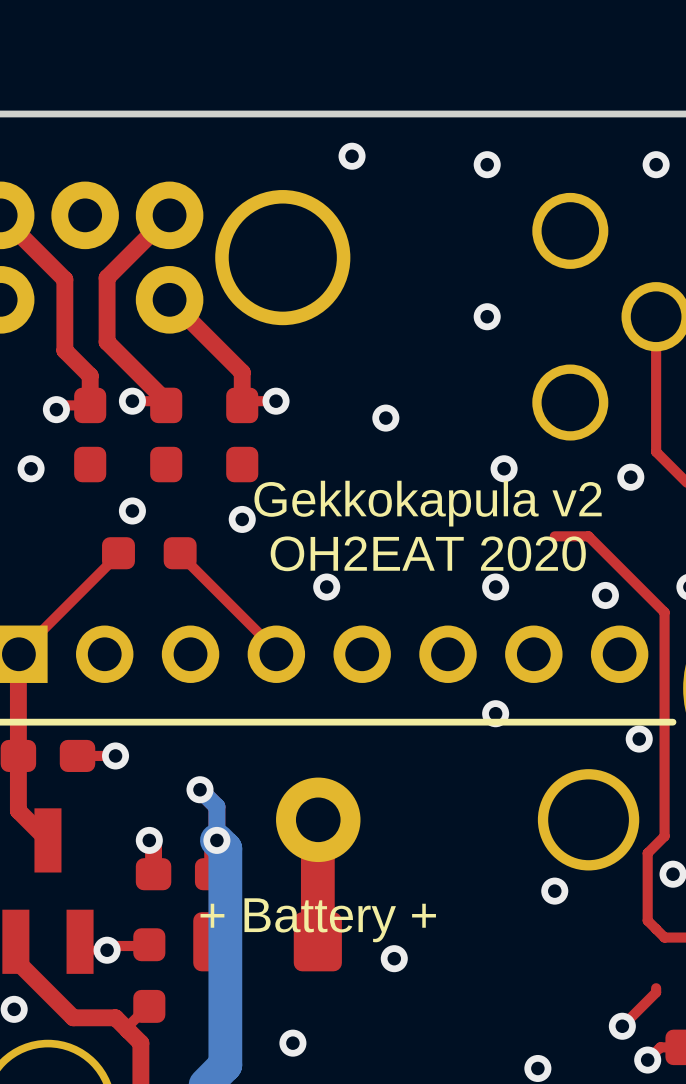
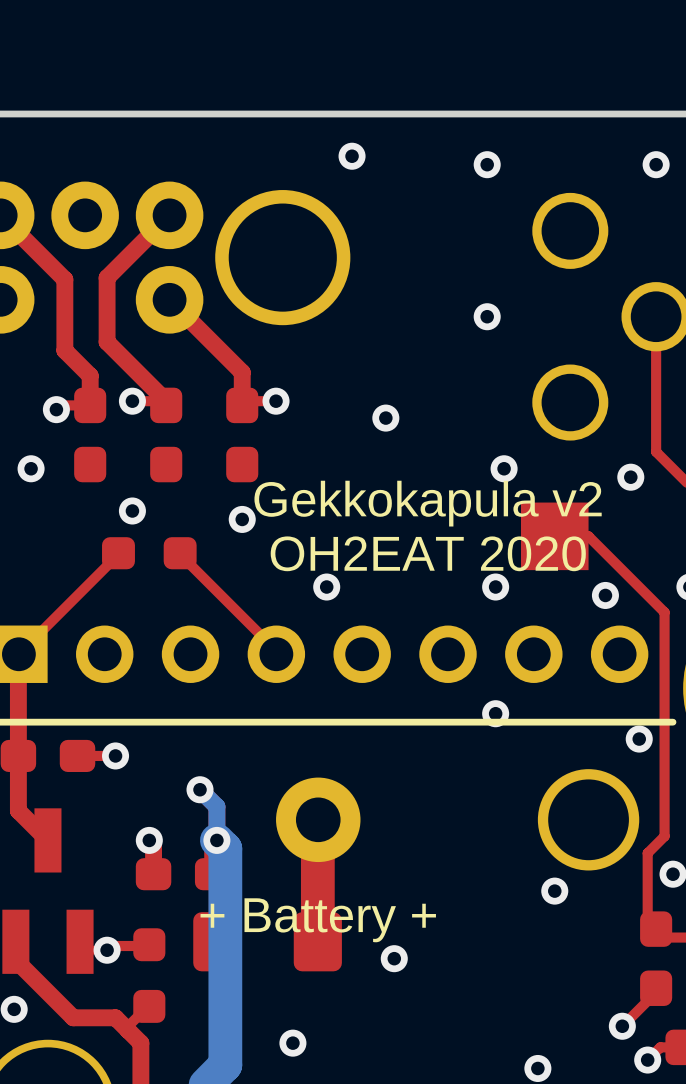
part: none -> (554, 536)
part: none -> (656, 958)

